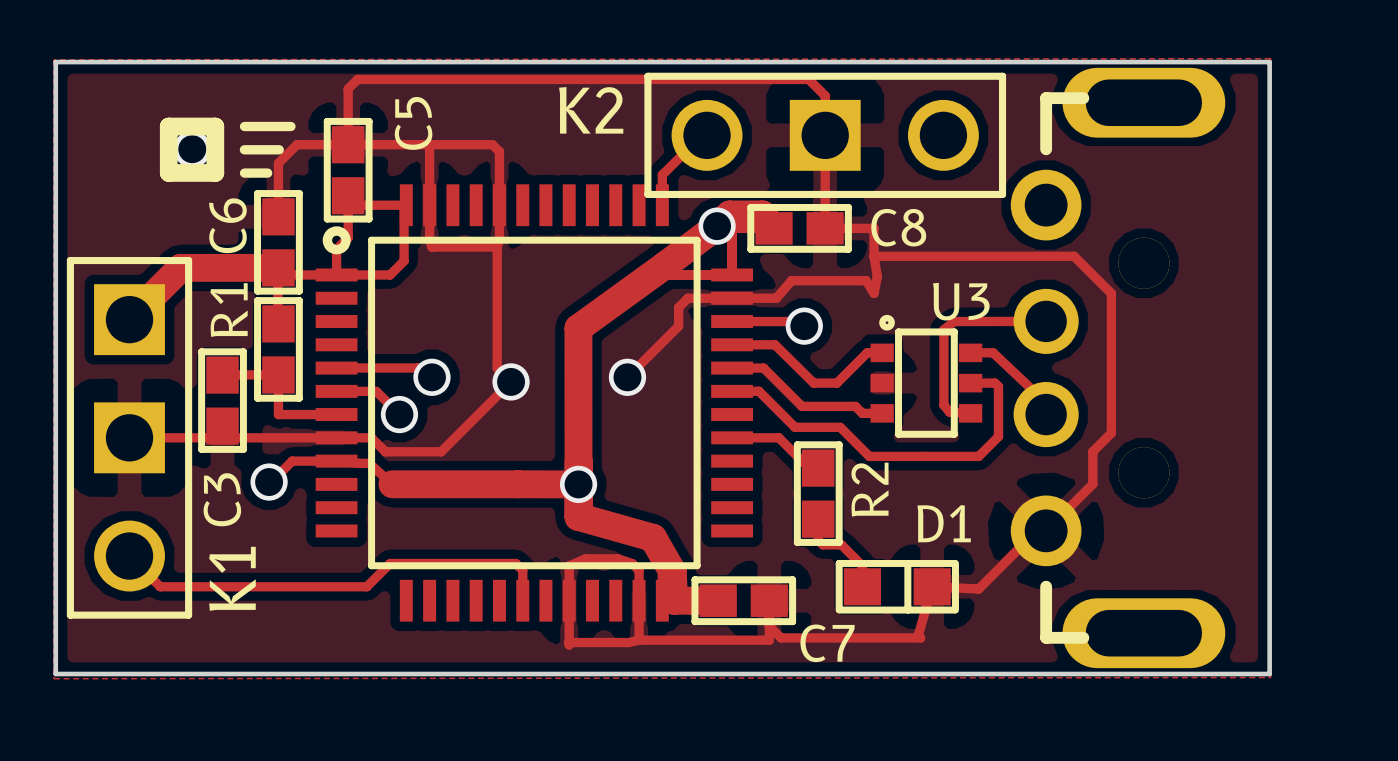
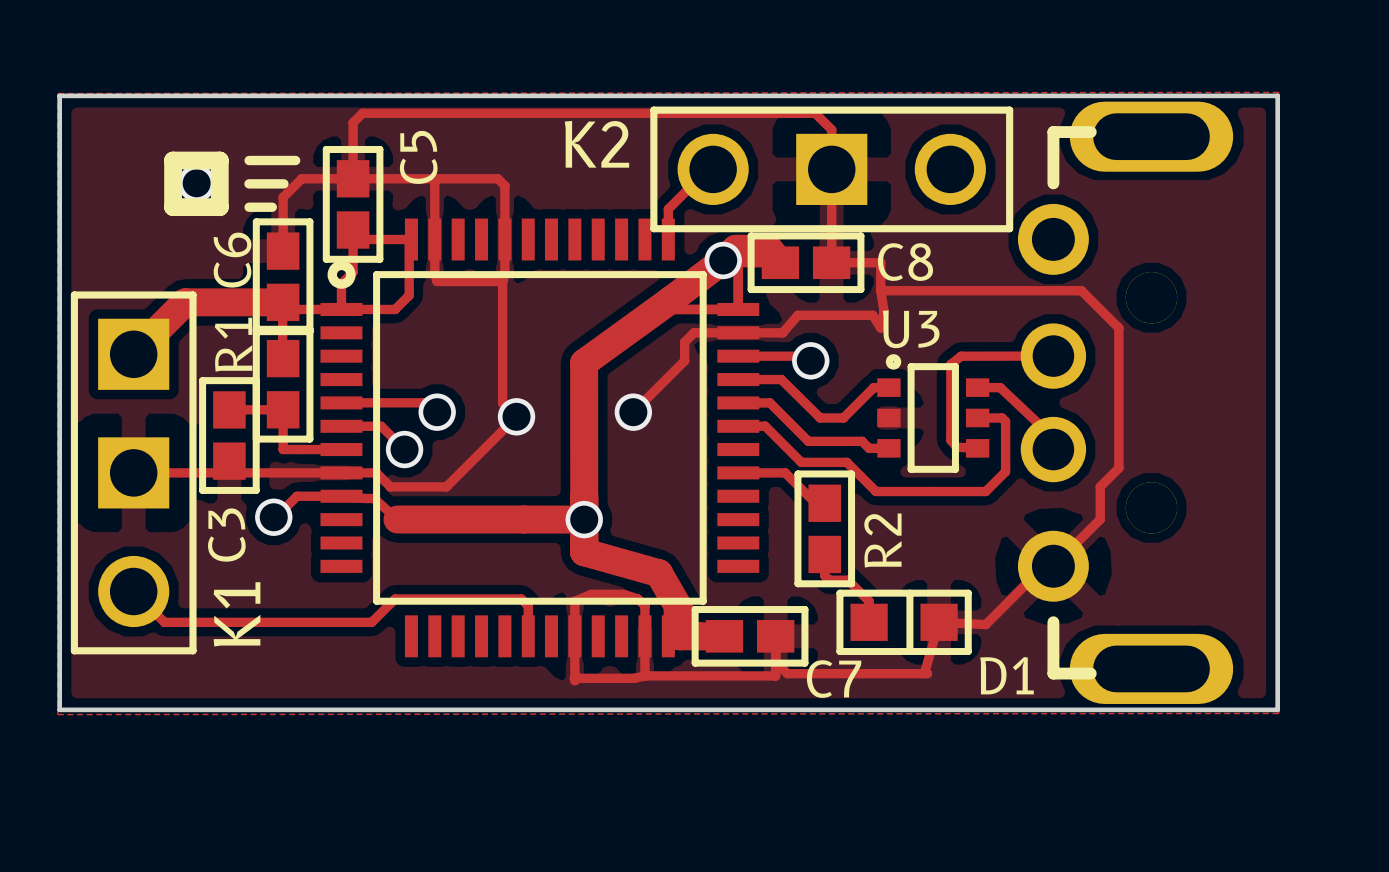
C5 footprint: [323, 117, 373, 223] -> [322, 145, 384, 263]
C6 footprint: [254, 190, 303, 295] -> [252, 218, 314, 336]
C8 footprint: [747, 203, 852, 253] -> [747, 232, 865, 294]
R1 footprint: [254, 297, 303, 402] -> [252, 325, 314, 443]
U3 name position: U3 (961, 301) -> U3 (911, 329)
U3 footprint: [870, 314, 983, 438] -> [877, 354, 990, 473]
C3 footprint: [198, 348, 247, 453] -> [199, 377, 260, 494]
R2 footprint: [793, 441, 843, 546] -> [794, 470, 856, 588]
R2 name position: R2 (869, 489) -> R2 (882, 540)
D1 name position: D1 (944, 523) -> D1 (1007, 675)
D1 footprint: [835, 559, 959, 614] -> [836, 589, 972, 656]
C7 footprint: [691, 576, 797, 626] -> [691, 606, 809, 667]

